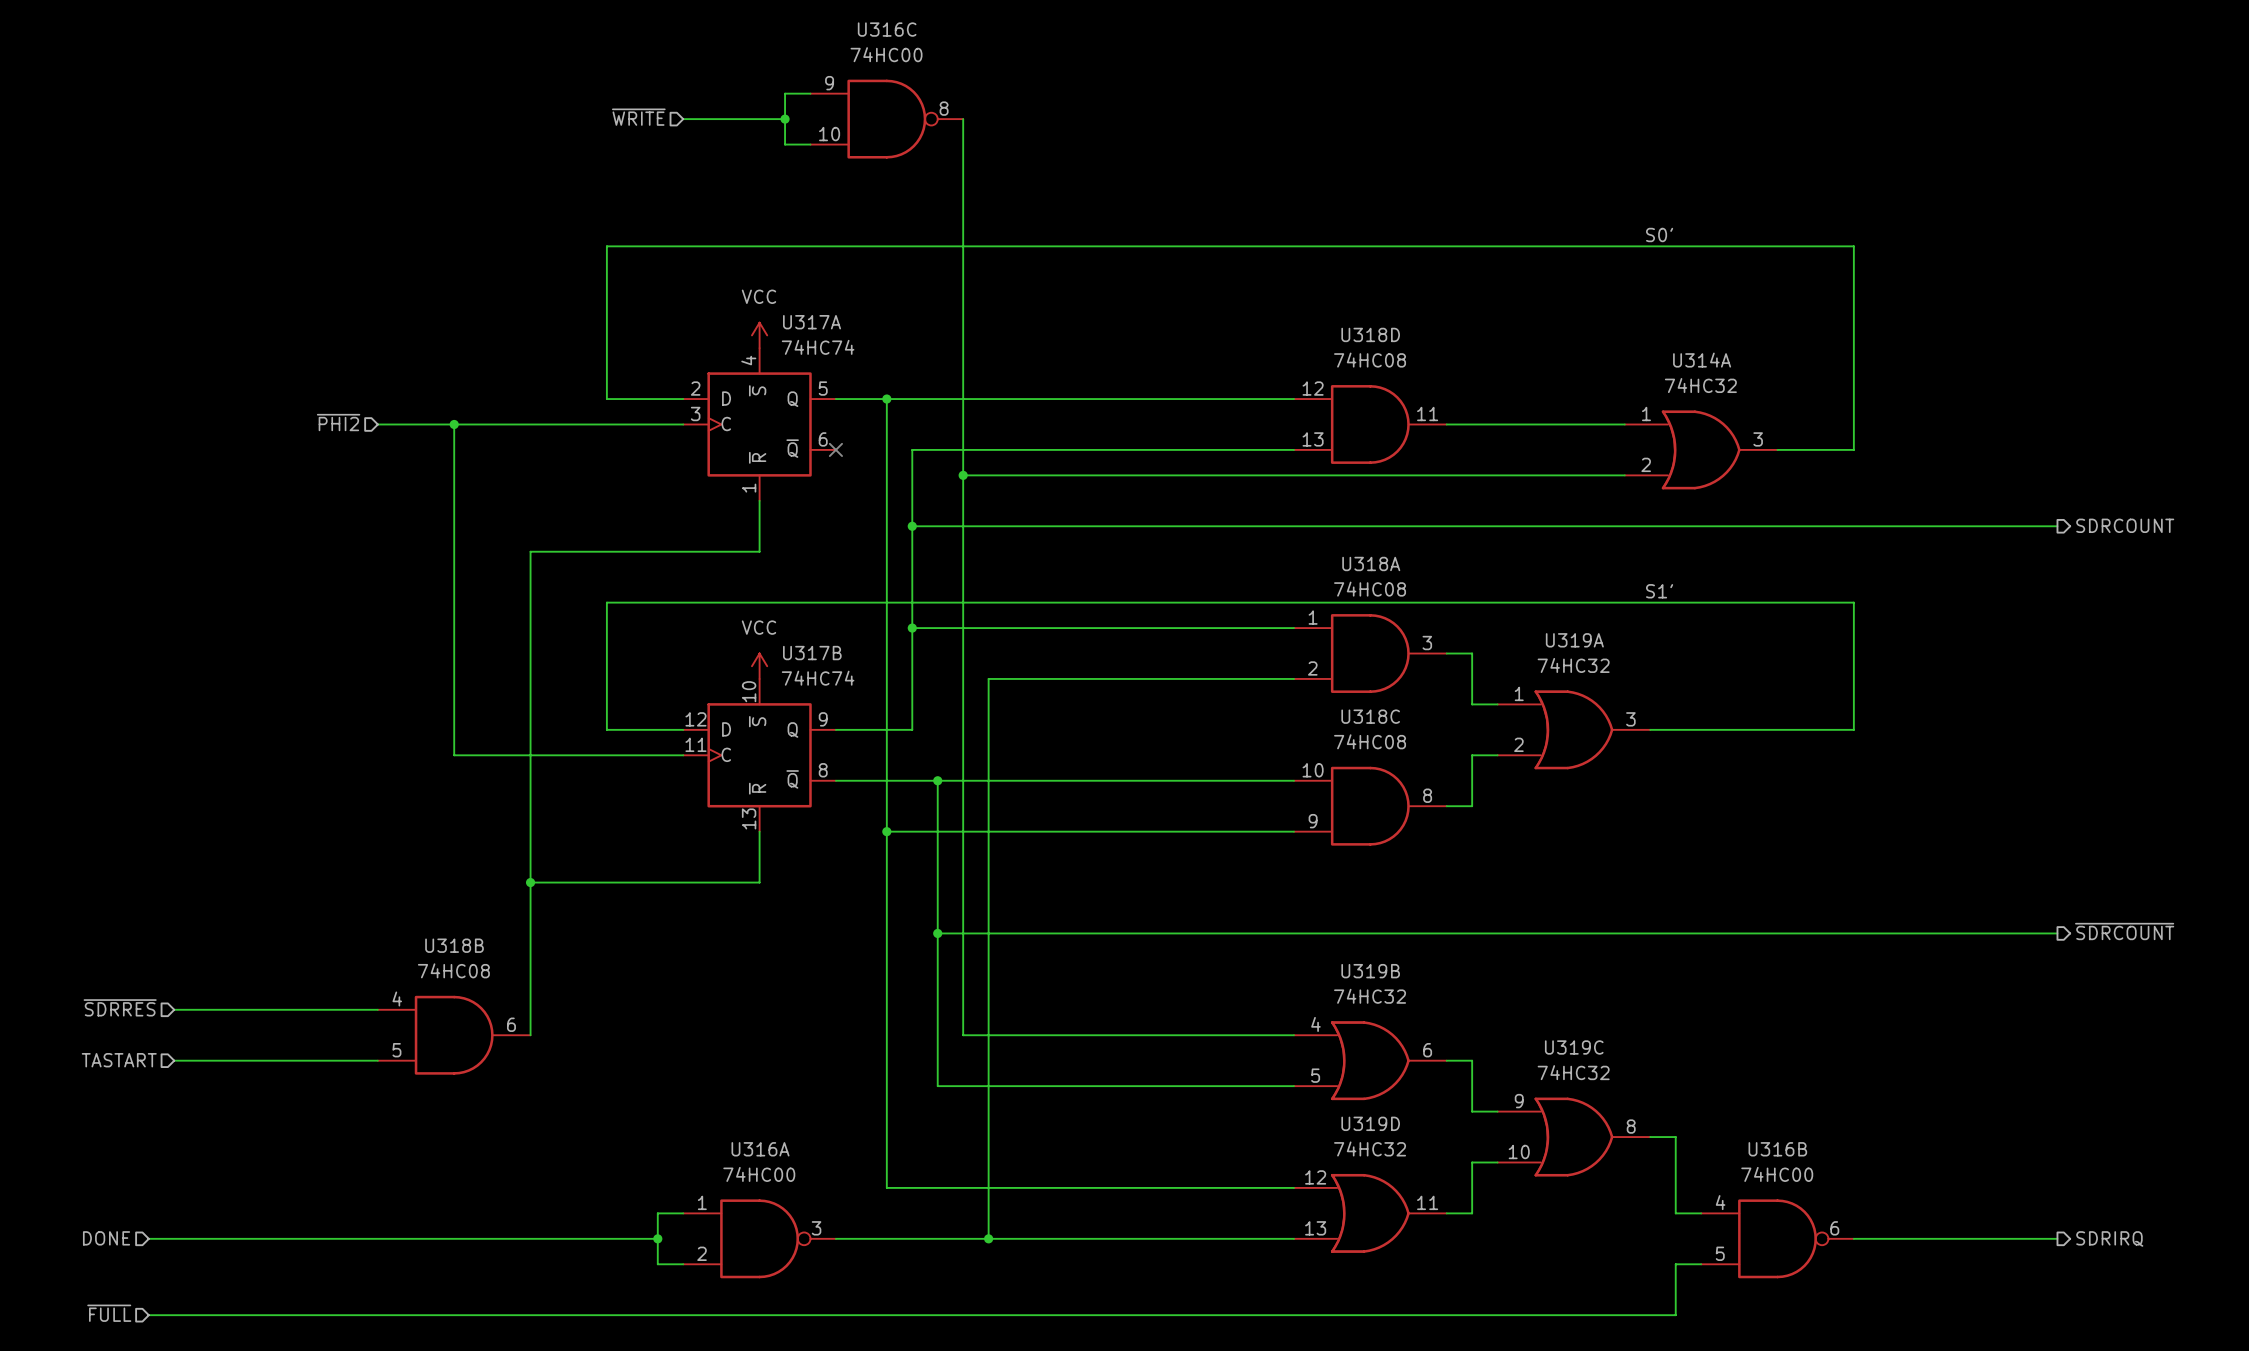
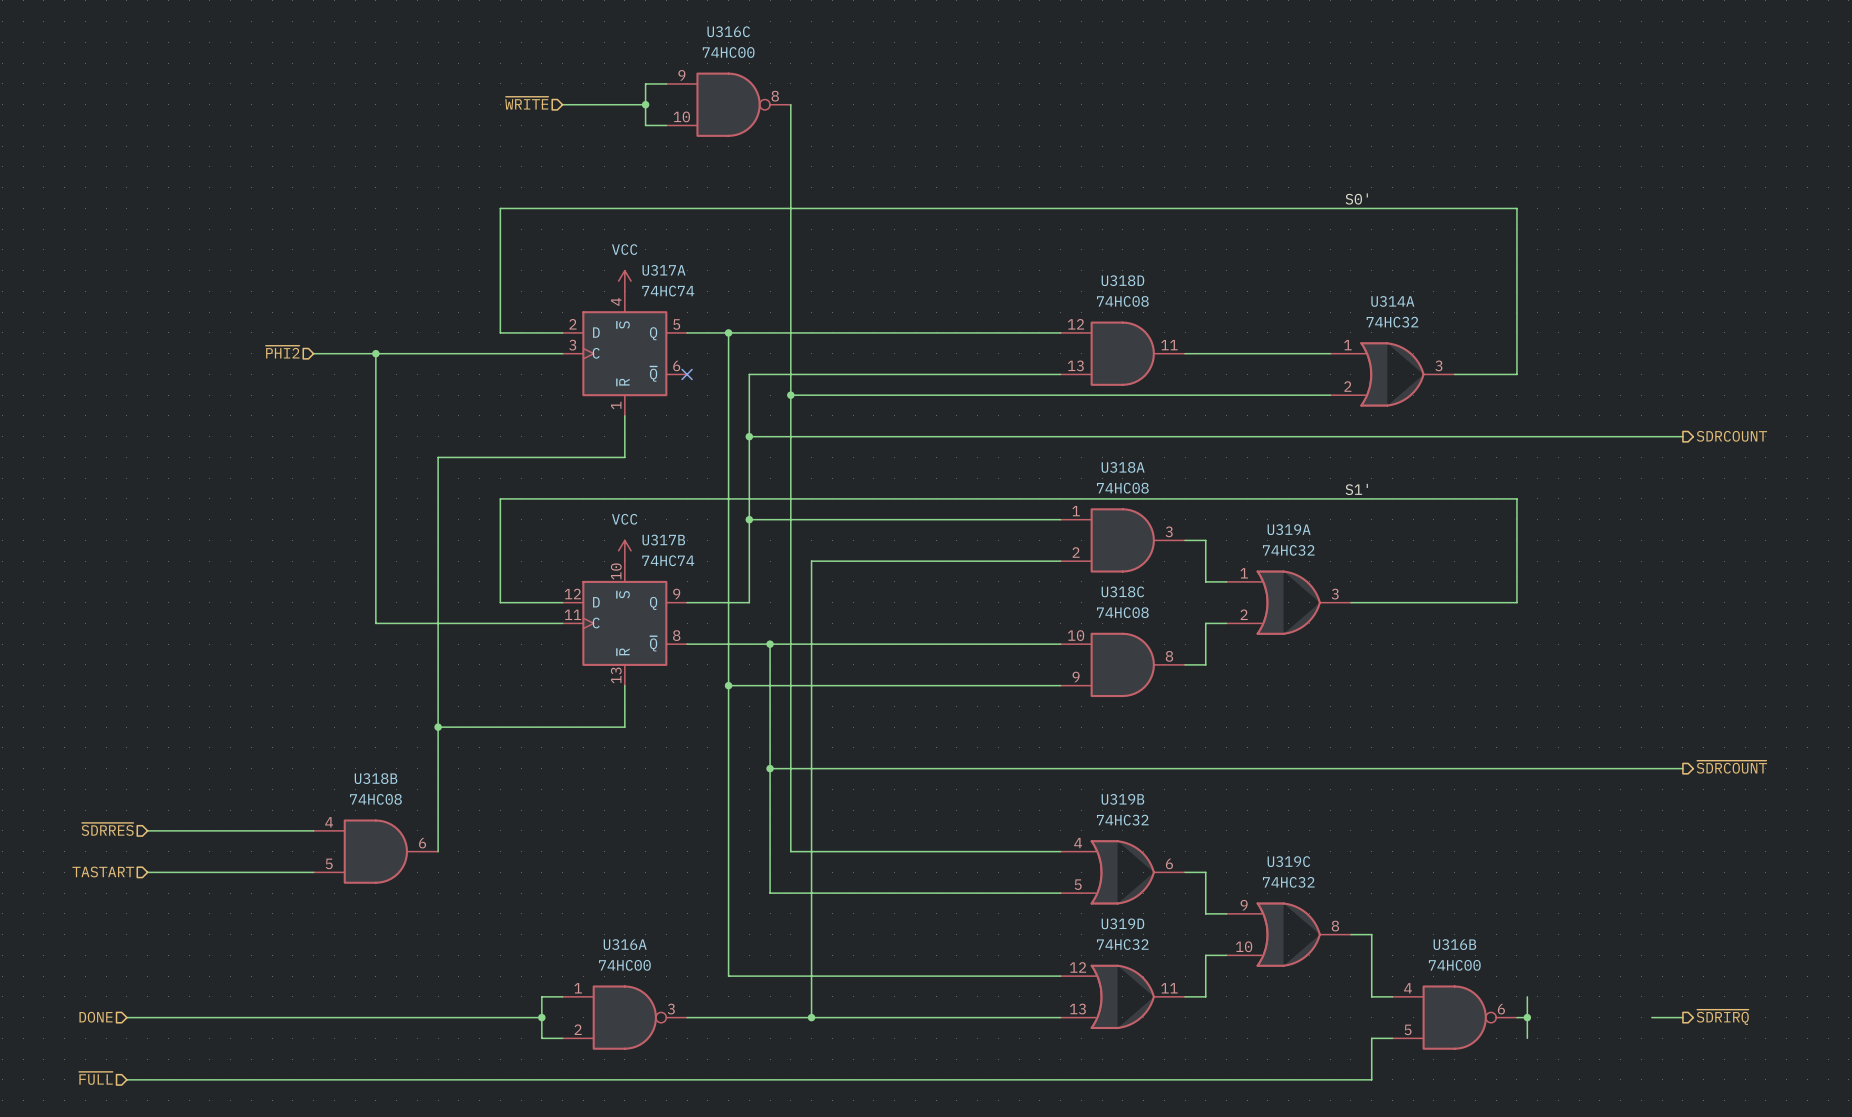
wire: none -> (1527, 996) (1527, 1038)
wire: (1866, 1238) (2019, 1238) -> none
junction: none -> (1527, 1017)
hierarchical label: SDRIRQ (2109, 1238) -> ~{SDRIRQ} (1722, 1017)

